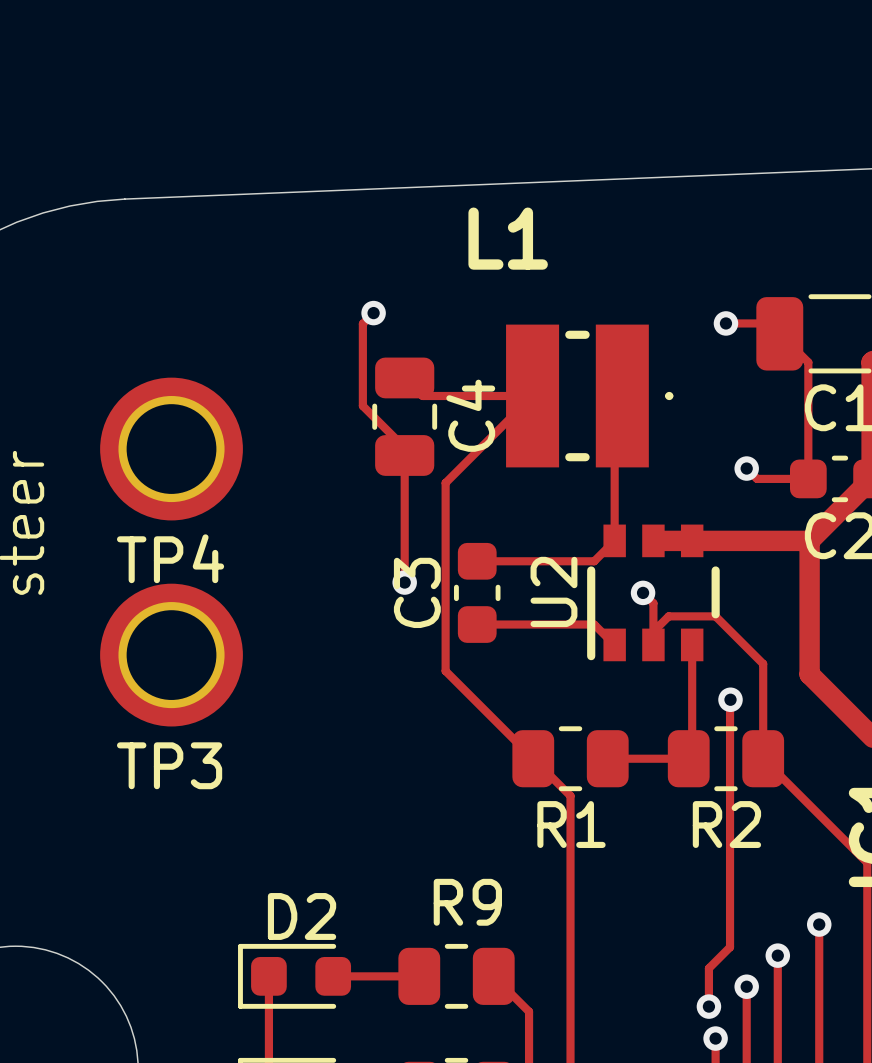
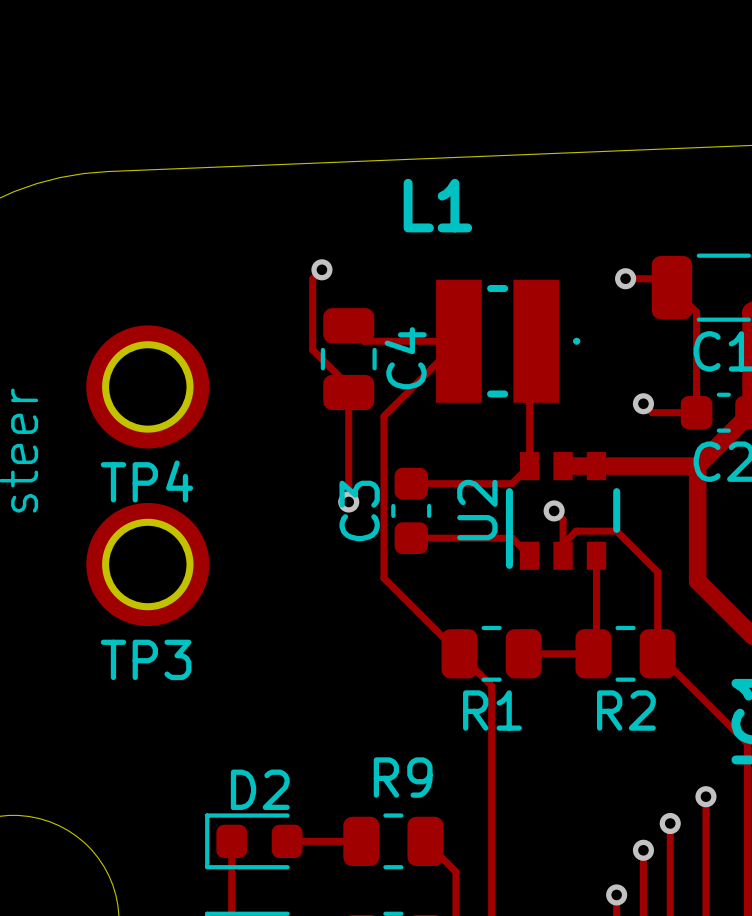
via: (730, 699) -> none
track: (730, 700) (730, 947) (708, 968) (708, 1006) -> none
via: (708, 1006) -> none

